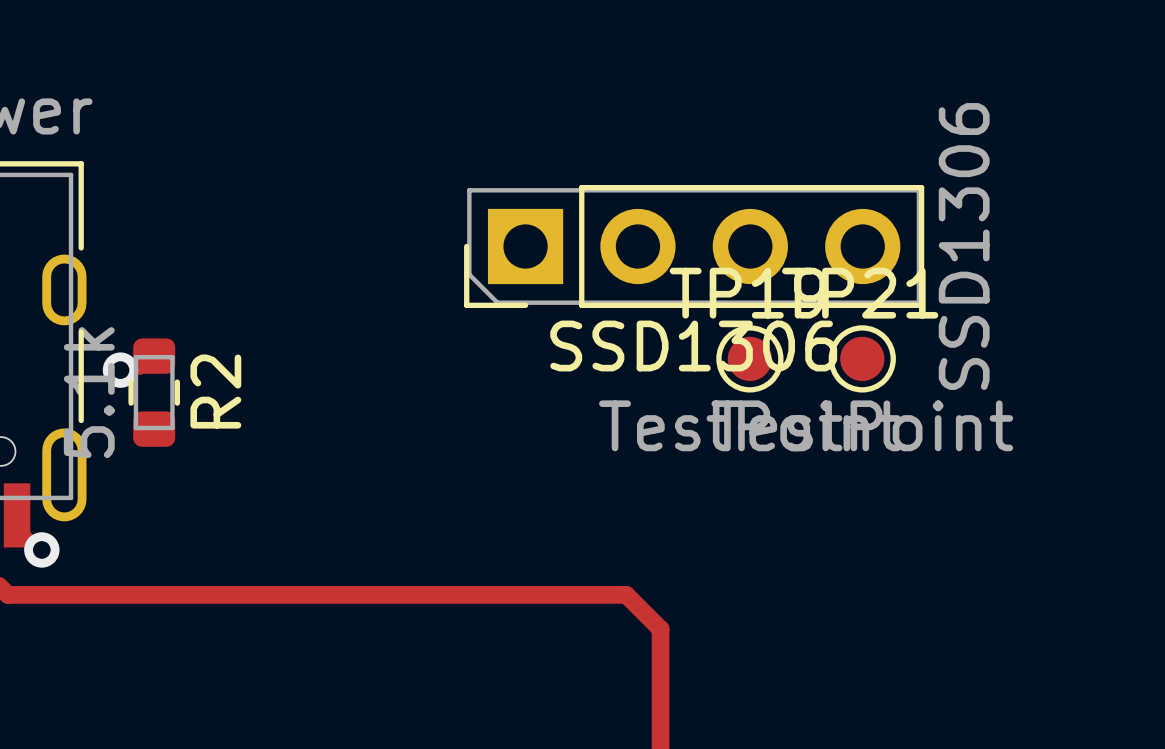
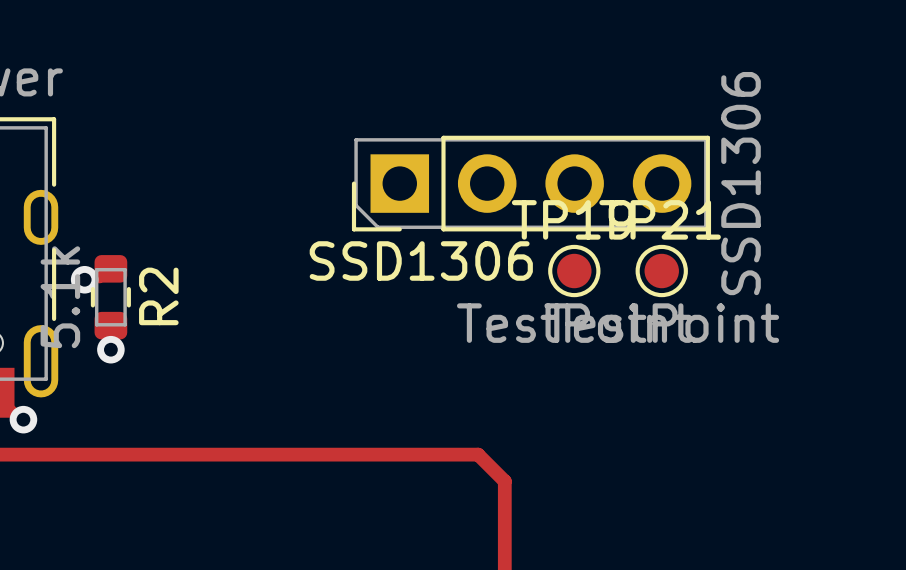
SSD1306 name position: SSD1306 (693, 345) -> SSD1306 (421, 260)
via: none -> (110, 349)

